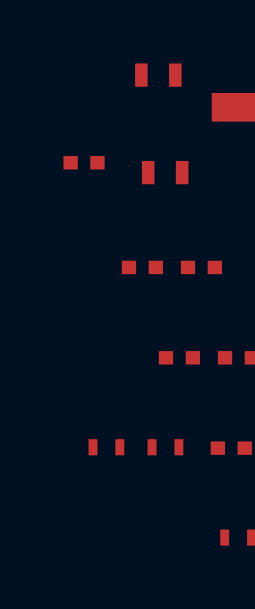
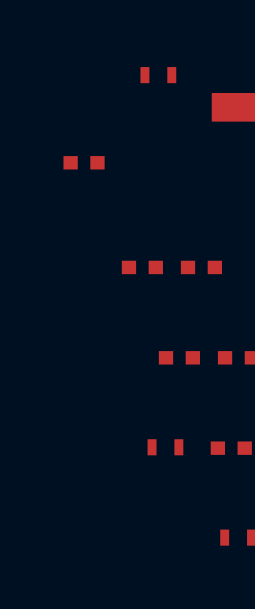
part footprint: [135, 63, 182, 87] -> [140, 67, 177, 84]
part: (165, 172) -> none
part: (106, 447) -> none

